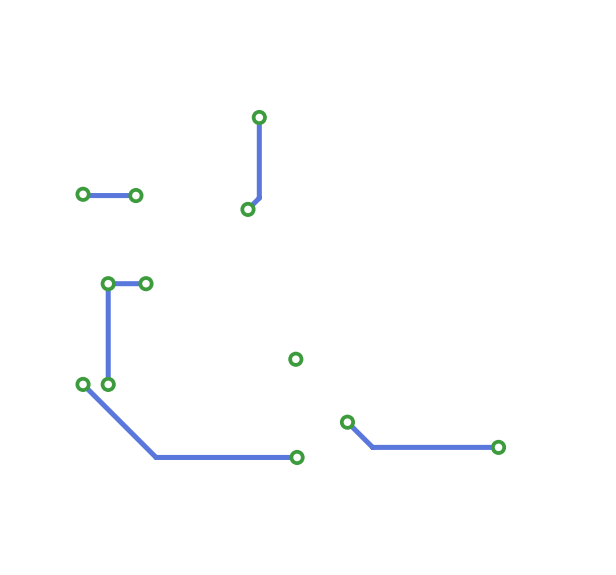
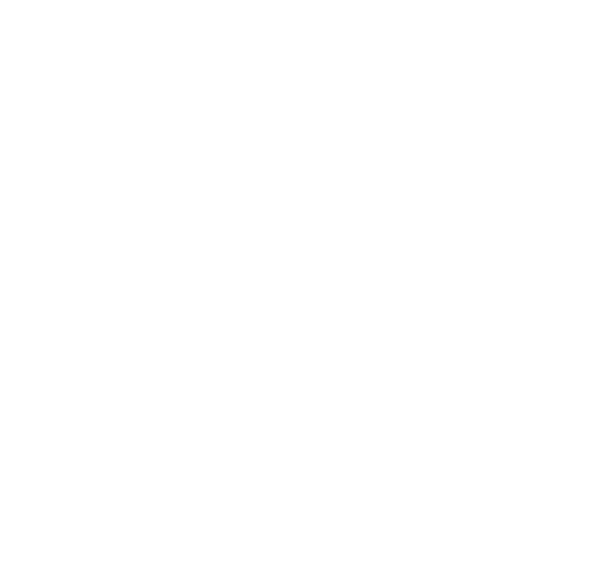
track: (259, 117) (259, 198) (247, 209) -> none
via: (259, 117) -> none
track: (83, 194) (135, 195) -> none
via: (83, 194) -> none
via: (135, 195) -> none
via: (247, 209) -> none
via: (108, 283) -> none
track: (145, 283) (108, 283) (108, 384) -> none
via: (145, 283) -> none
via: (295, 359) -> none
track: (83, 384) (156, 457) (297, 457) -> none
via: (83, 384) -> none
via: (108, 384) -> none
track: (347, 422) (372, 447) (498, 447) -> none
via: (347, 422) -> none
via: (498, 447) -> none
via: (297, 457) -> none

